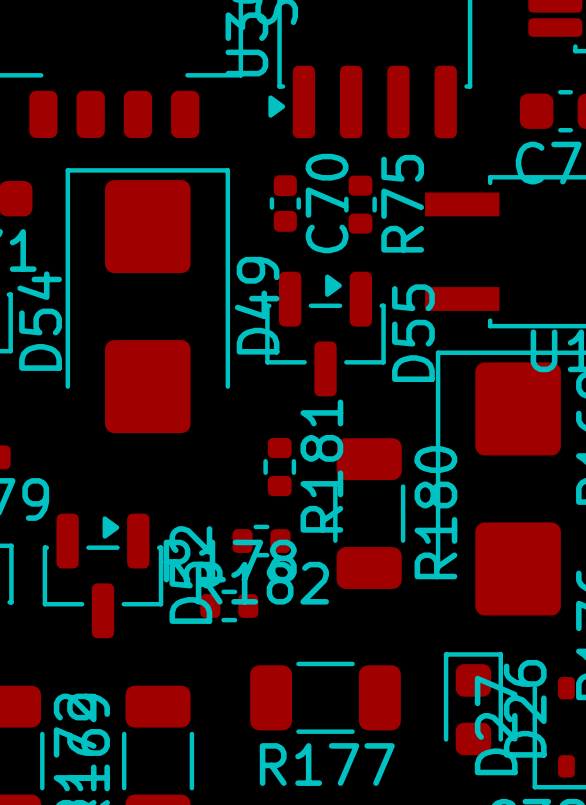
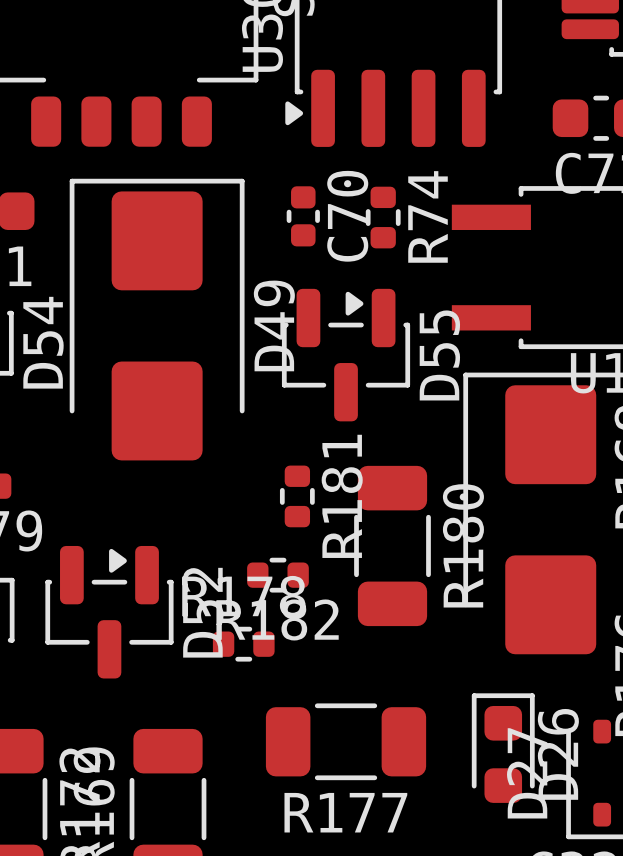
R75 name: R75 (402, 203) -> R74 (428, 216)

